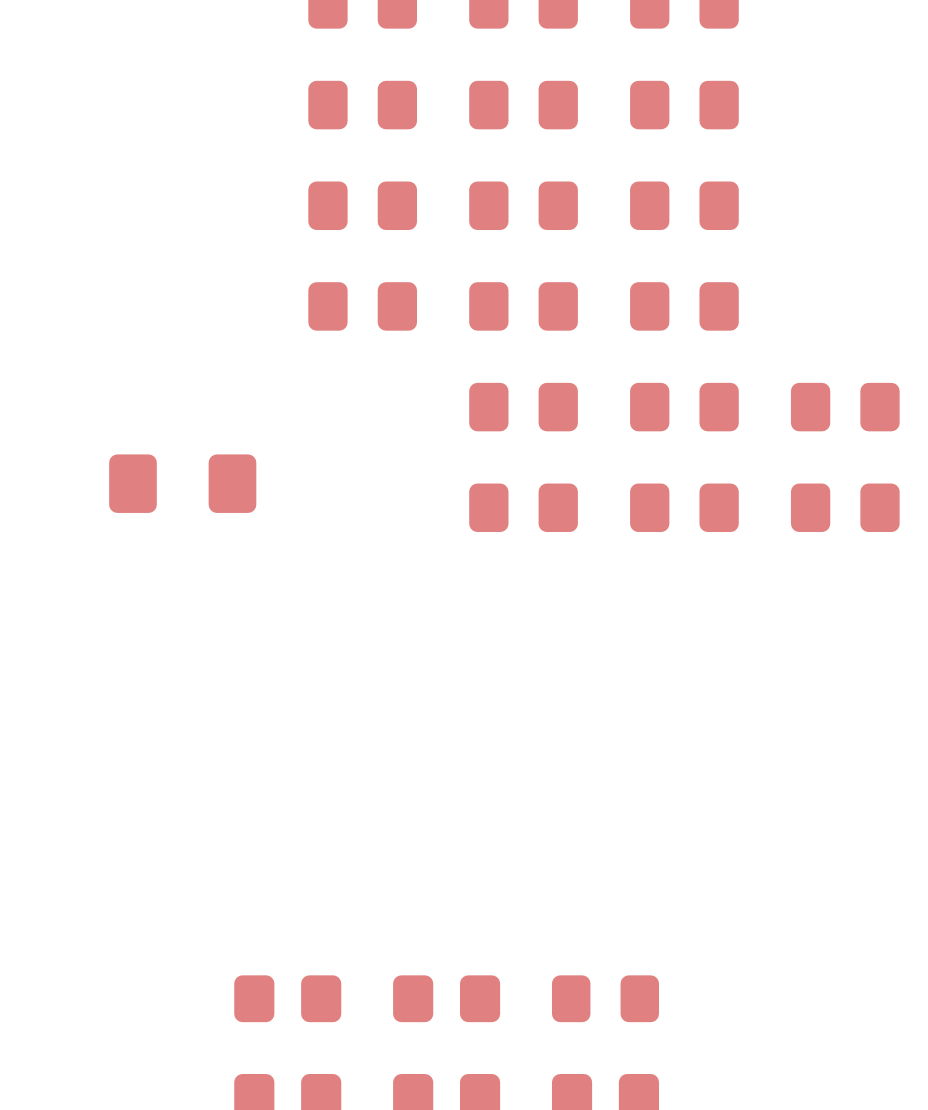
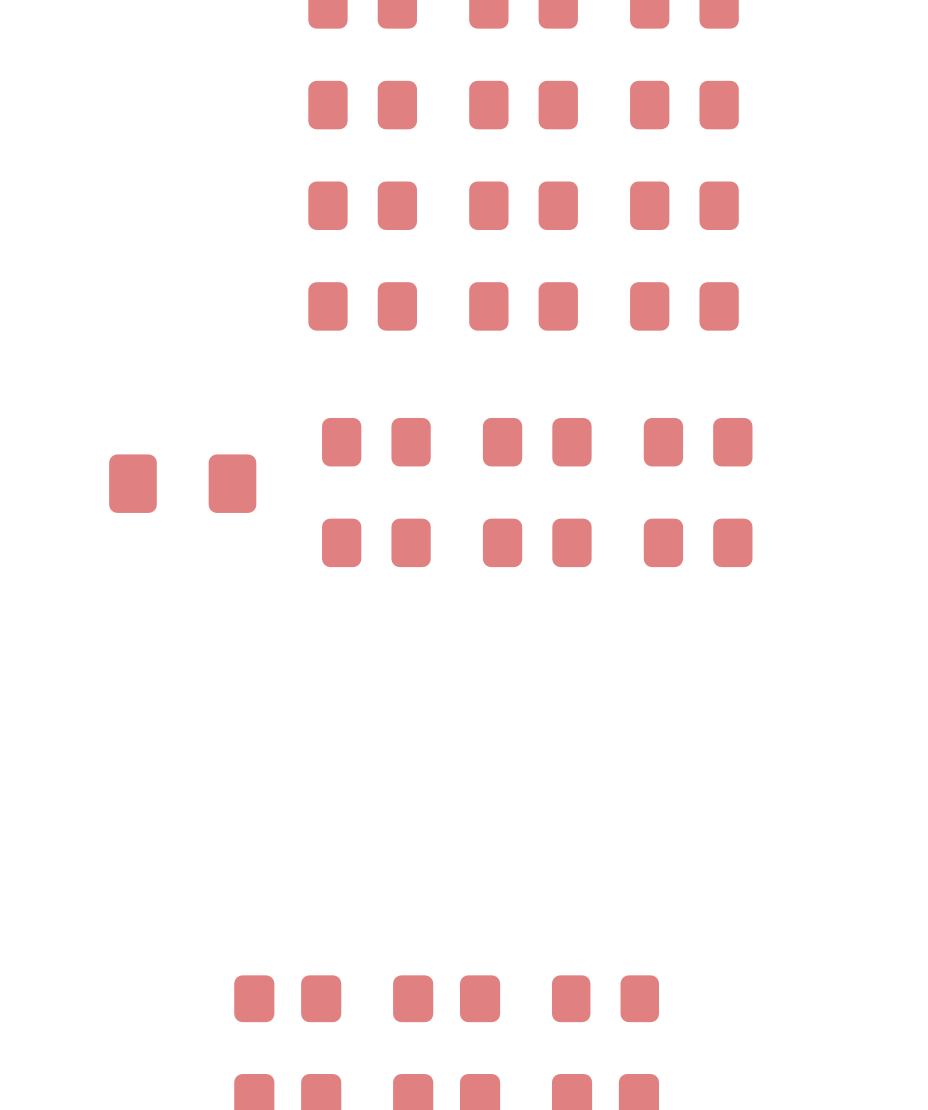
part: (523, 407) -> none
part: (684, 407) -> none
part: (845, 407) -> none
part: none -> (376, 442)
part: none -> (537, 442)
part: none -> (698, 442)
part: (523, 507) -> none
part: (684, 507) -> none
part: (845, 507) -> none
part: none -> (376, 542)
part: none -> (537, 542)
part: none -> (698, 542)

